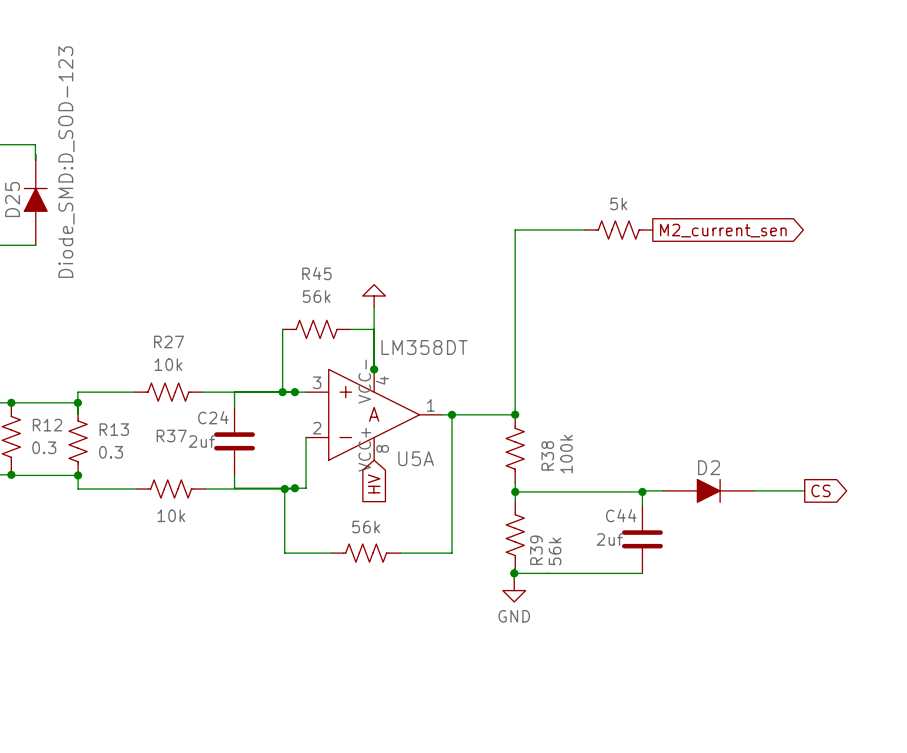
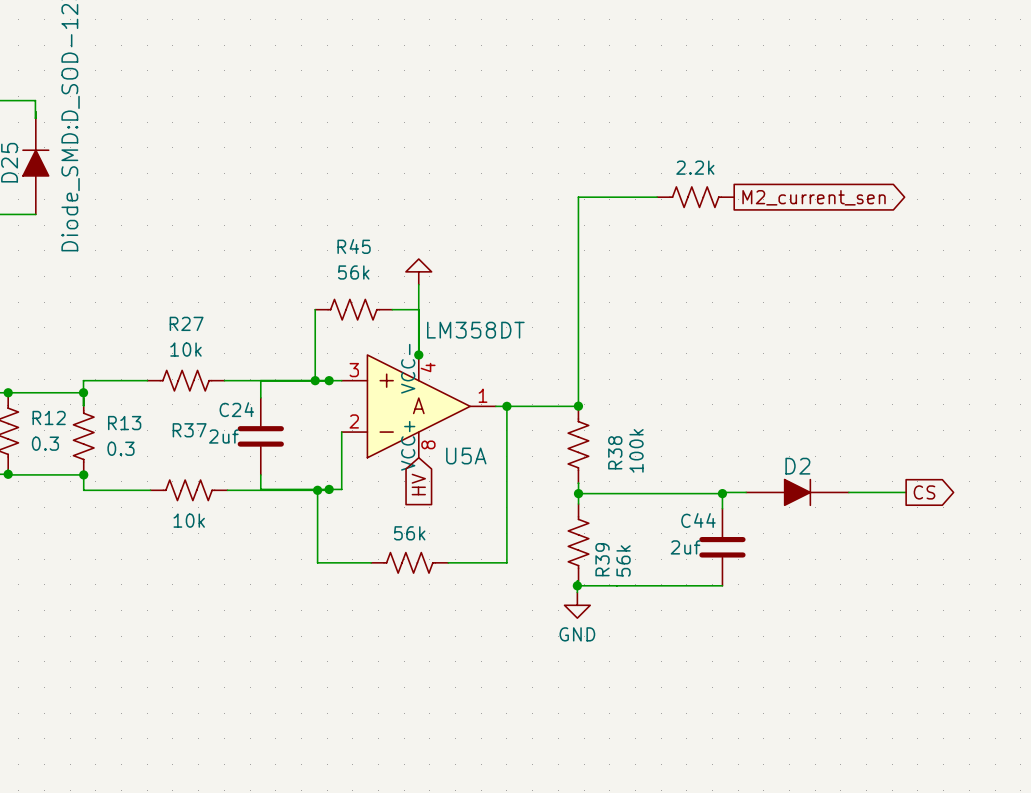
part value: 5k (618, 203) -> 2.2k (695, 167)

